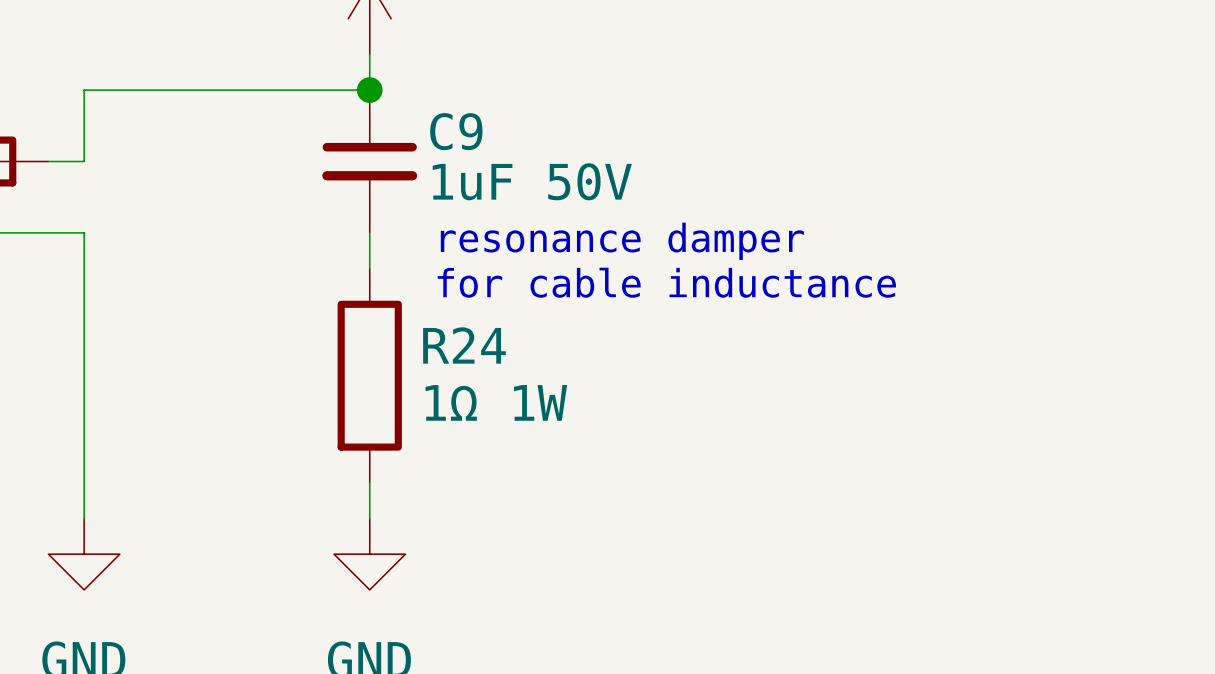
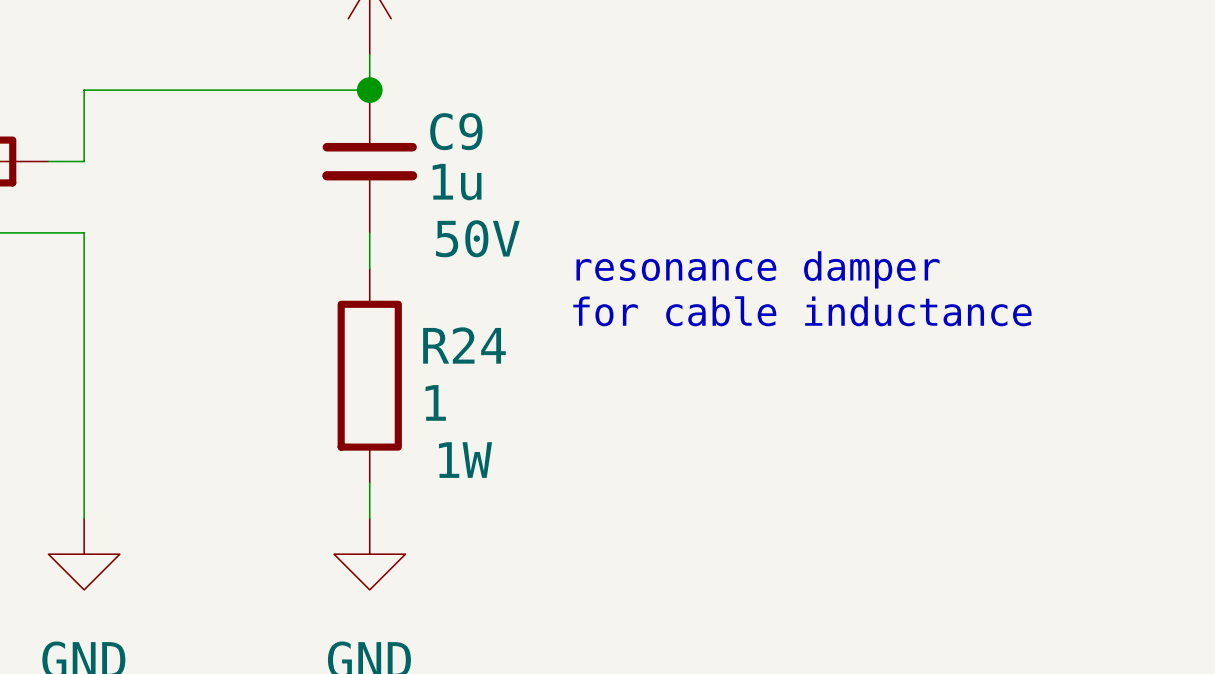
C9 value: 1uF 50V (532, 181) -> 1u (457, 182)
C9 text: none -> 50V (477, 238)
text position: resonance damper (622, 241) -> resonance damper (758, 269)
text position: for cable inductance (666, 282) -> for cable inductance (802, 311)
R24 value: 1Ω 1W (496, 402) -> 1 (435, 402)
R24 text: none -> 1W (465, 460)

